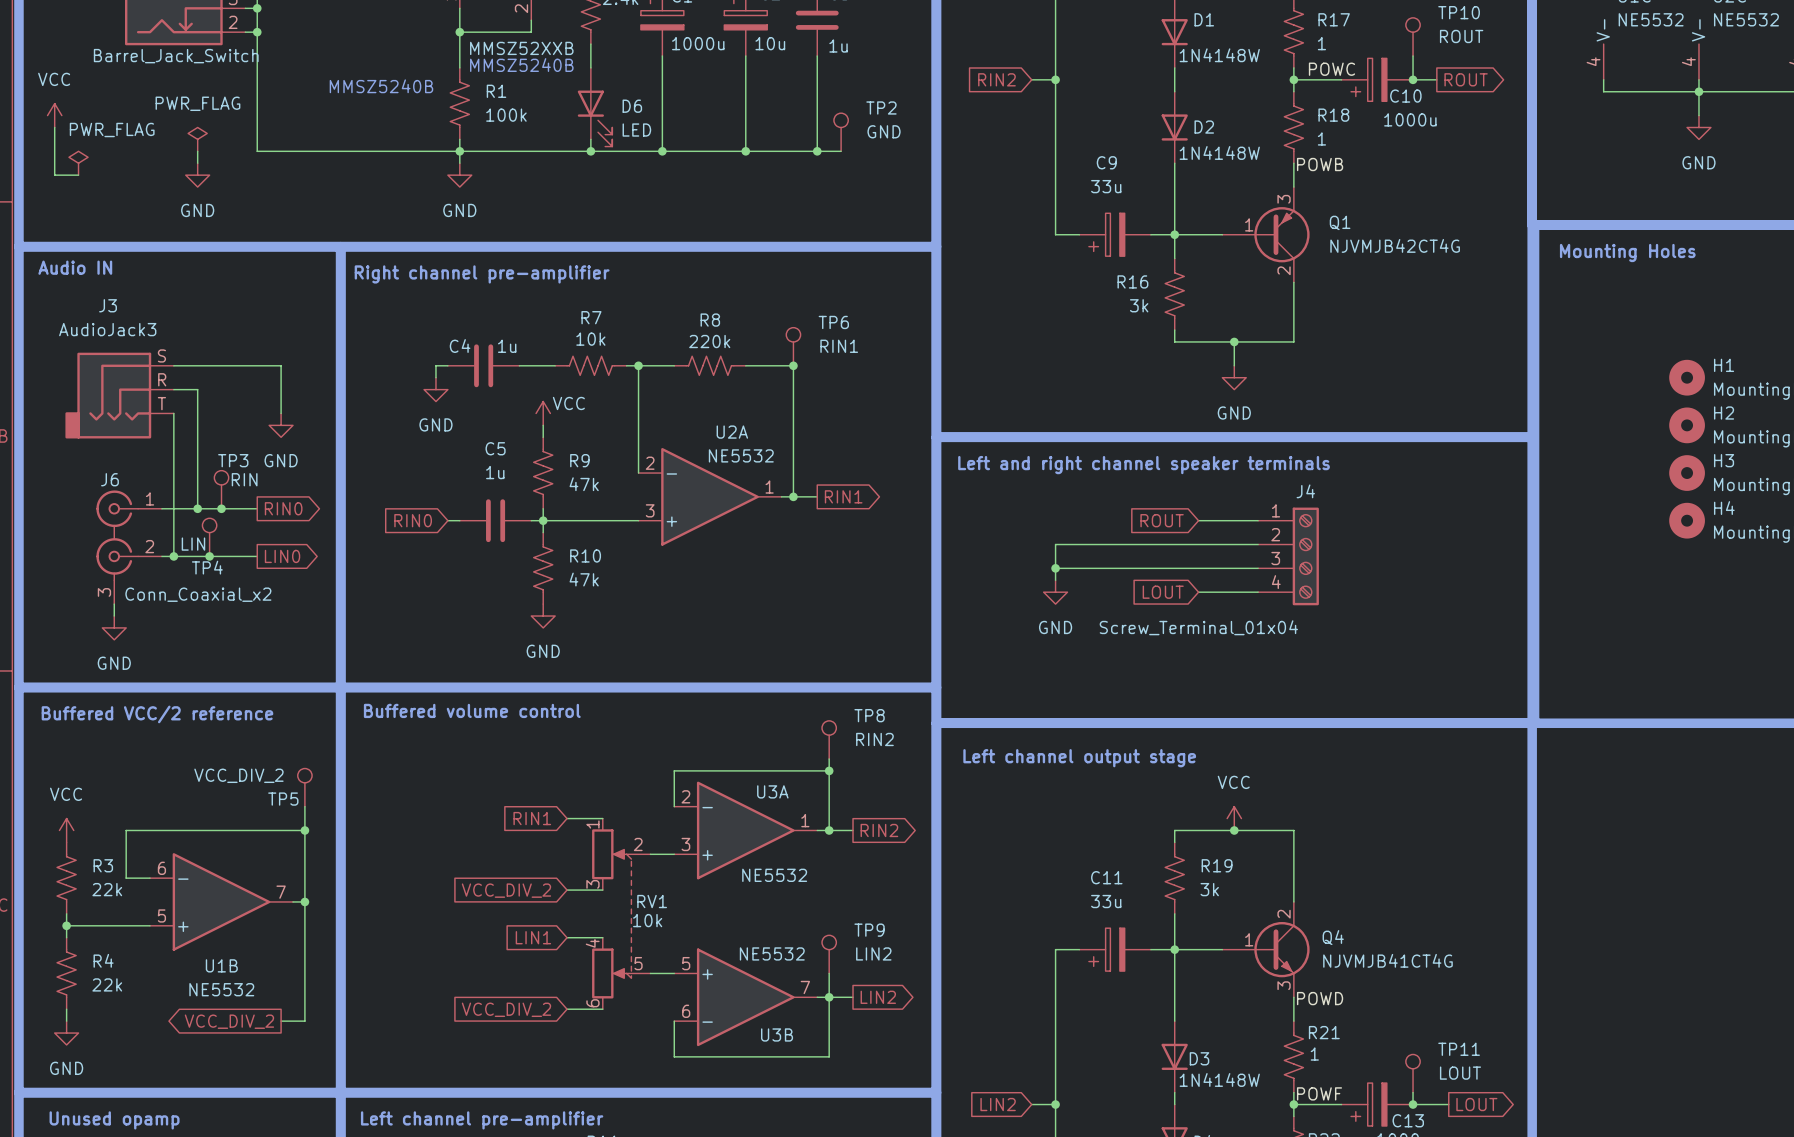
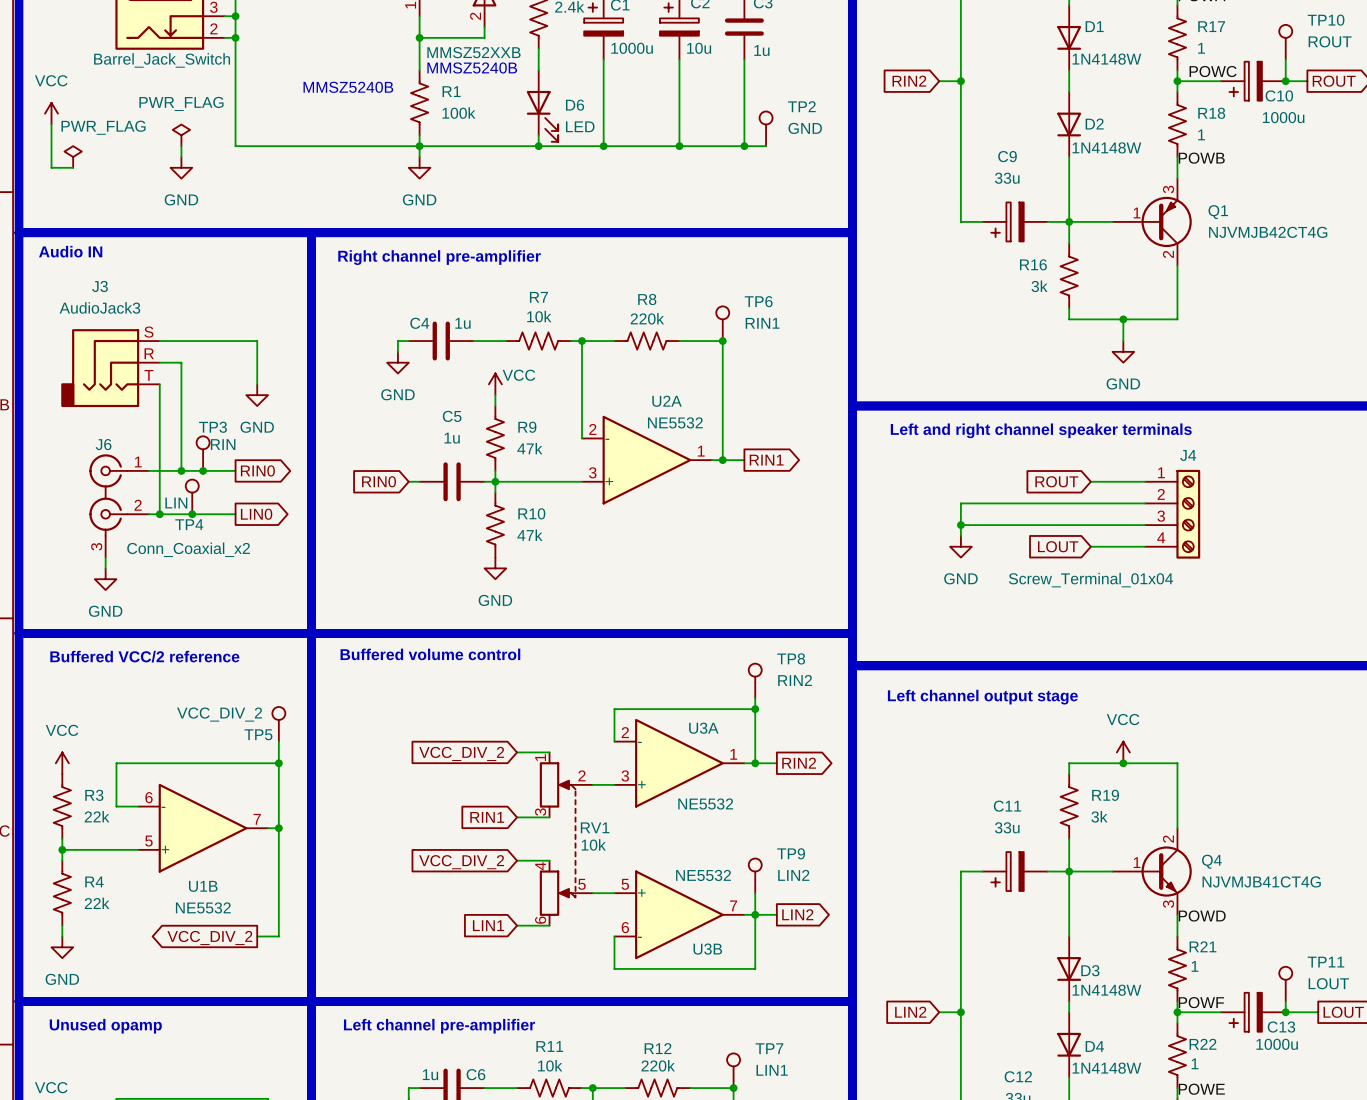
global label: RIN1 (532, 818) -> VCC_DIV_2 (461, 753)
global label: VCC_DIV_2 (506, 890) -> RIN1 (487, 817)
global label: LIN1 (533, 937) -> VCC_DIV_2 (461, 862)
global label: VCC_DIV_2 (506, 1009) -> LIN1 (488, 925)

